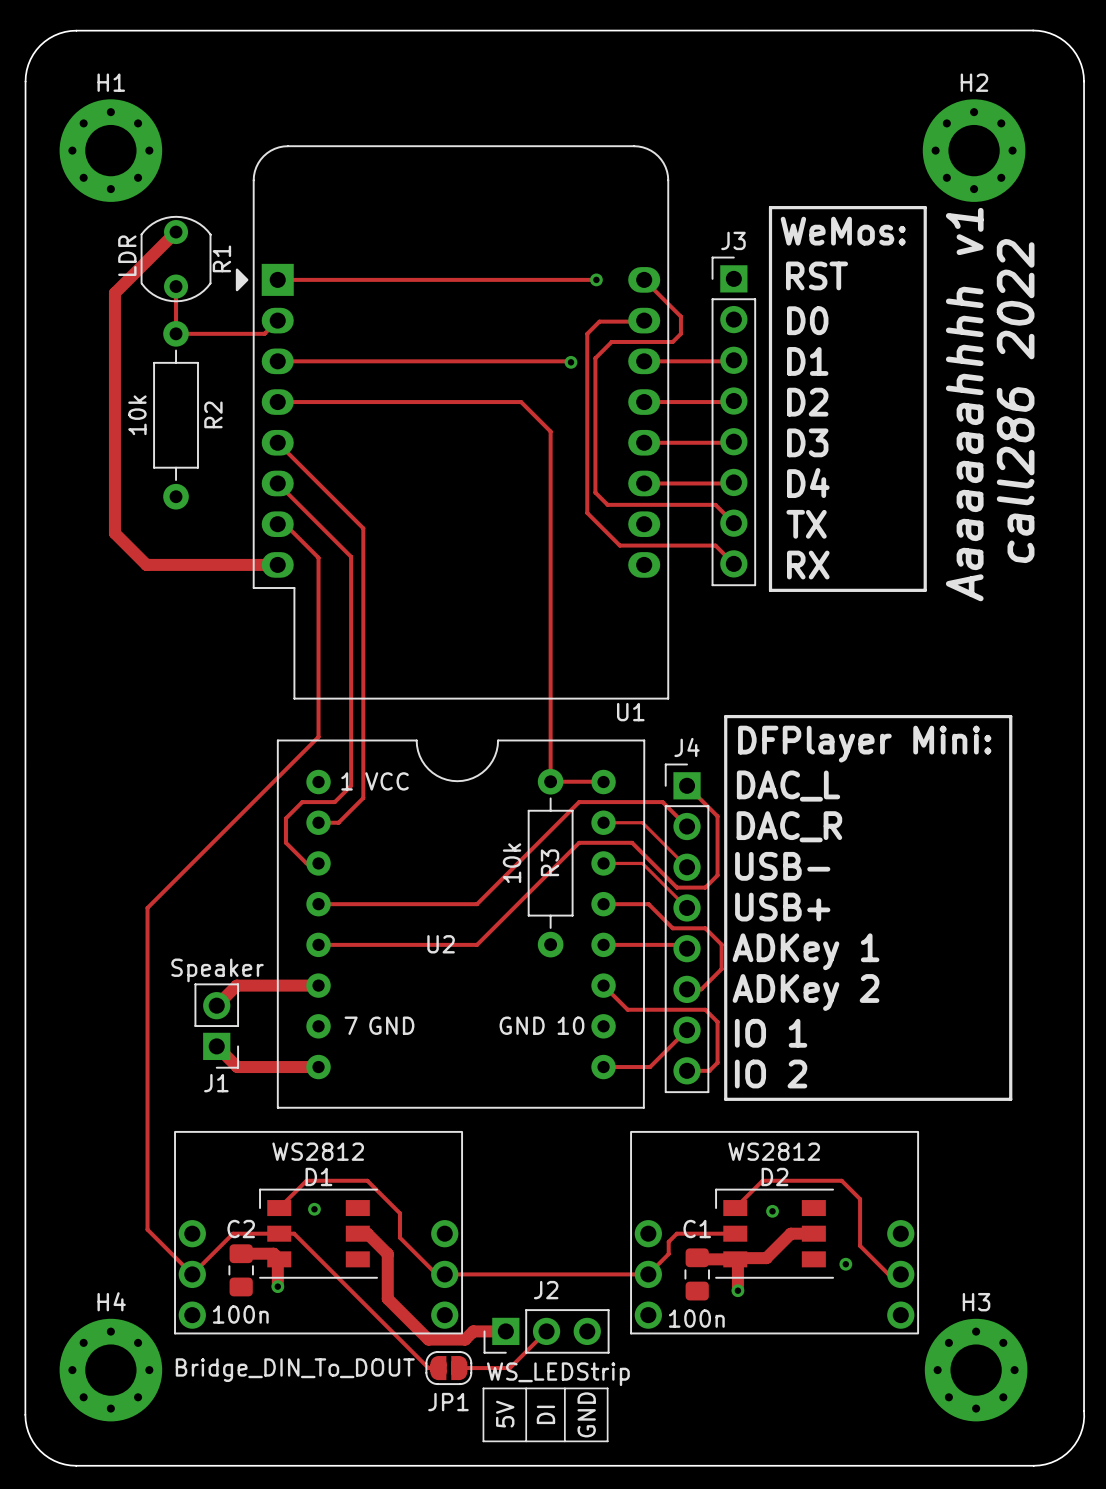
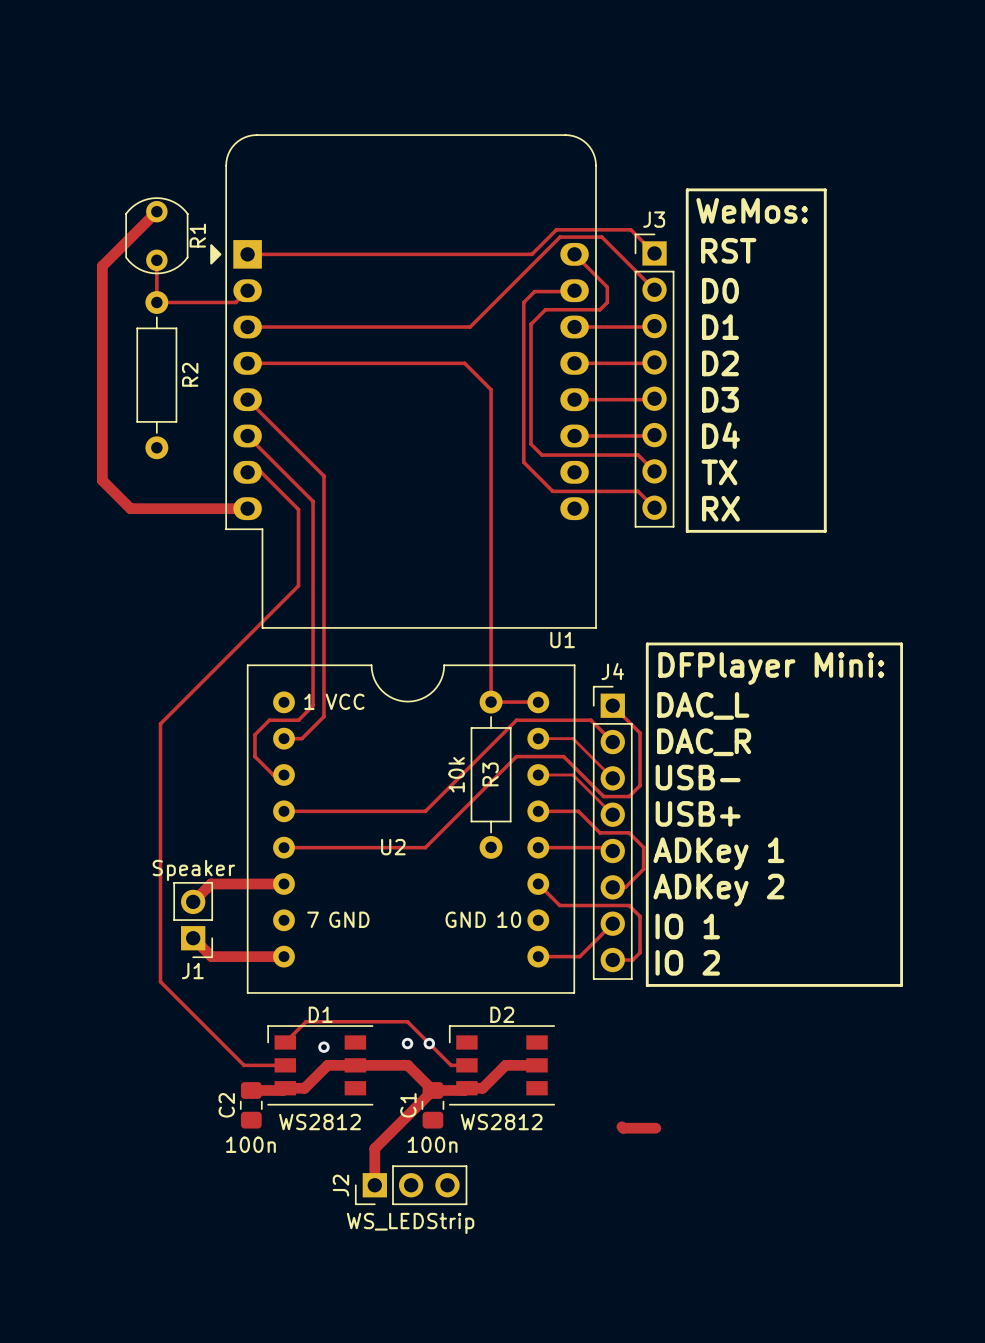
board edge: (1033, 30) (76, 30) (59, 33) (49, 38) (33, 54) (28, 64) (25, 81) (25, 1414) (28, 1431) (33, 1441) (49, 1458) (64, 1464) (76, 1465) (1033, 1465) (1056, 1460) (1074, 1444) (1082, 1428) (1084, 1416) (1084, 81) (1079, 59) (1069, 45) (1055, 35) (1033, 30) -> none
H1: (110, 150) -> none
H2: (974, 150) -> none
R1 value: LDR (127, 255) -> none
track: none -> (654, 253) (630, 229) (556, 229) (531, 254)
via: (596, 279) -> none
track: (527, 361) (570, 362) -> (470, 327) (560, 237) (601, 237) (654, 289)
via: (570, 362) -> none
text: call286 2022 (1015, 401) -> none
text: Aaaaaaahhhh v1 (964, 404) -> none
R2 value: 10k (137, 415) -> none
track: (284, 524) (318, 557) (318, 736) (147, 907) (147, 1229) (192, 1274) (233, 1233) (294, 1233) (428, 1368) (440, 1368) -> (254, 472) (261, 472) (298, 509) (298, 585) (160, 723) (160, 981) (244, 1065) (285, 1065)
D1 footprint: [174, 1130, 464, 1335] -> [267, 1025, 374, 1106]
D2 footprint: [630, 1130, 920, 1335] -> [448, 1025, 556, 1106]
D1 value position: WS2812 (318, 1151) -> WS2812 (319, 1122)
D2 value position: WS2812 (774, 1151) -> WS2812 (501, 1122)
track: none -> (285, 1042) (306, 1021) (407, 1021) (451, 1065) (466, 1065)
via: none -> (407, 1043)
via: none -> (429, 1043)
track: none -> (537, 1065) (505, 1065) (482, 1088) (432, 1090)
track: (279, 1208) (306, 1180) (367, 1180) (399, 1213) (399, 1237) (436, 1274) (648, 1274) (668, 1254) (668, 1241) (676, 1233) (735, 1233) -> none
track: (735, 1208) (762, 1180) (841, 1180) (860, 1199) (860, 1245) (888, 1274) (900, 1274) -> none
via position: (314, 1209) -> (323, 1047)
via: (772, 1211) -> none
track: none -> (251, 1090) (304, 1088) (327, 1065) (407, 1065) (432, 1090)
track: none -> (432, 1090) (374, 1148) (374, 1185)
C2 name rotation: 0° (241, 1229) -> 90° counterclockwise (226, 1105)
C1 name rotation: 0° (697, 1229) -> 90° counterclockwise (408, 1105)
C1 name position: C1 (697, 1229) -> C1 (408, 1105)
track: (357, 1233) (367, 1233) (387, 1254) (387, 1298) (428, 1339) (465, 1339) (473, 1331) (505, 1331) -> none
track: (813, 1233) (790, 1233) (766, 1258) (736, 1258) (737, 1290) -> none
track: (241, 1253) (273, 1253) (279, 1259) (277, 1286) -> none
via: (845, 1264) -> none
C2 position: (241, 1270) -> (251, 1105)
C1 position: (697, 1274) -> (432, 1105)
via: (277, 1286) -> none
J2 name rotation: 0° (546, 1290) -> 90° counterclockwise (340, 1185)
J2 name position: J2 (546, 1290) -> J2 (340, 1185)
via: (737, 1290) -> none
track: (546, 1331) (509, 1368) (459, 1368) -> none
J2 position: (546, 1331) -> (411, 1185)
JP1: Bridge_DIN_To_DOUT (448, 1368) -> none
H4: (110, 1370) -> none
H3: (976, 1370) -> none
J2 value position: WS_LEDStrip (558, 1374) -> WS_LEDStrip (410, 1223)
line: (483, 1388) (607, 1388) (607, 1441) (483, 1441) (483, 1388) -> none
line: (526, 1388) (526, 1441) -> none
line: (564, 1388) (564, 1441) -> none
text: 5V (505, 1414) -> none
text: DI (545, 1414) -> none
text: GND (586, 1414) -> none

